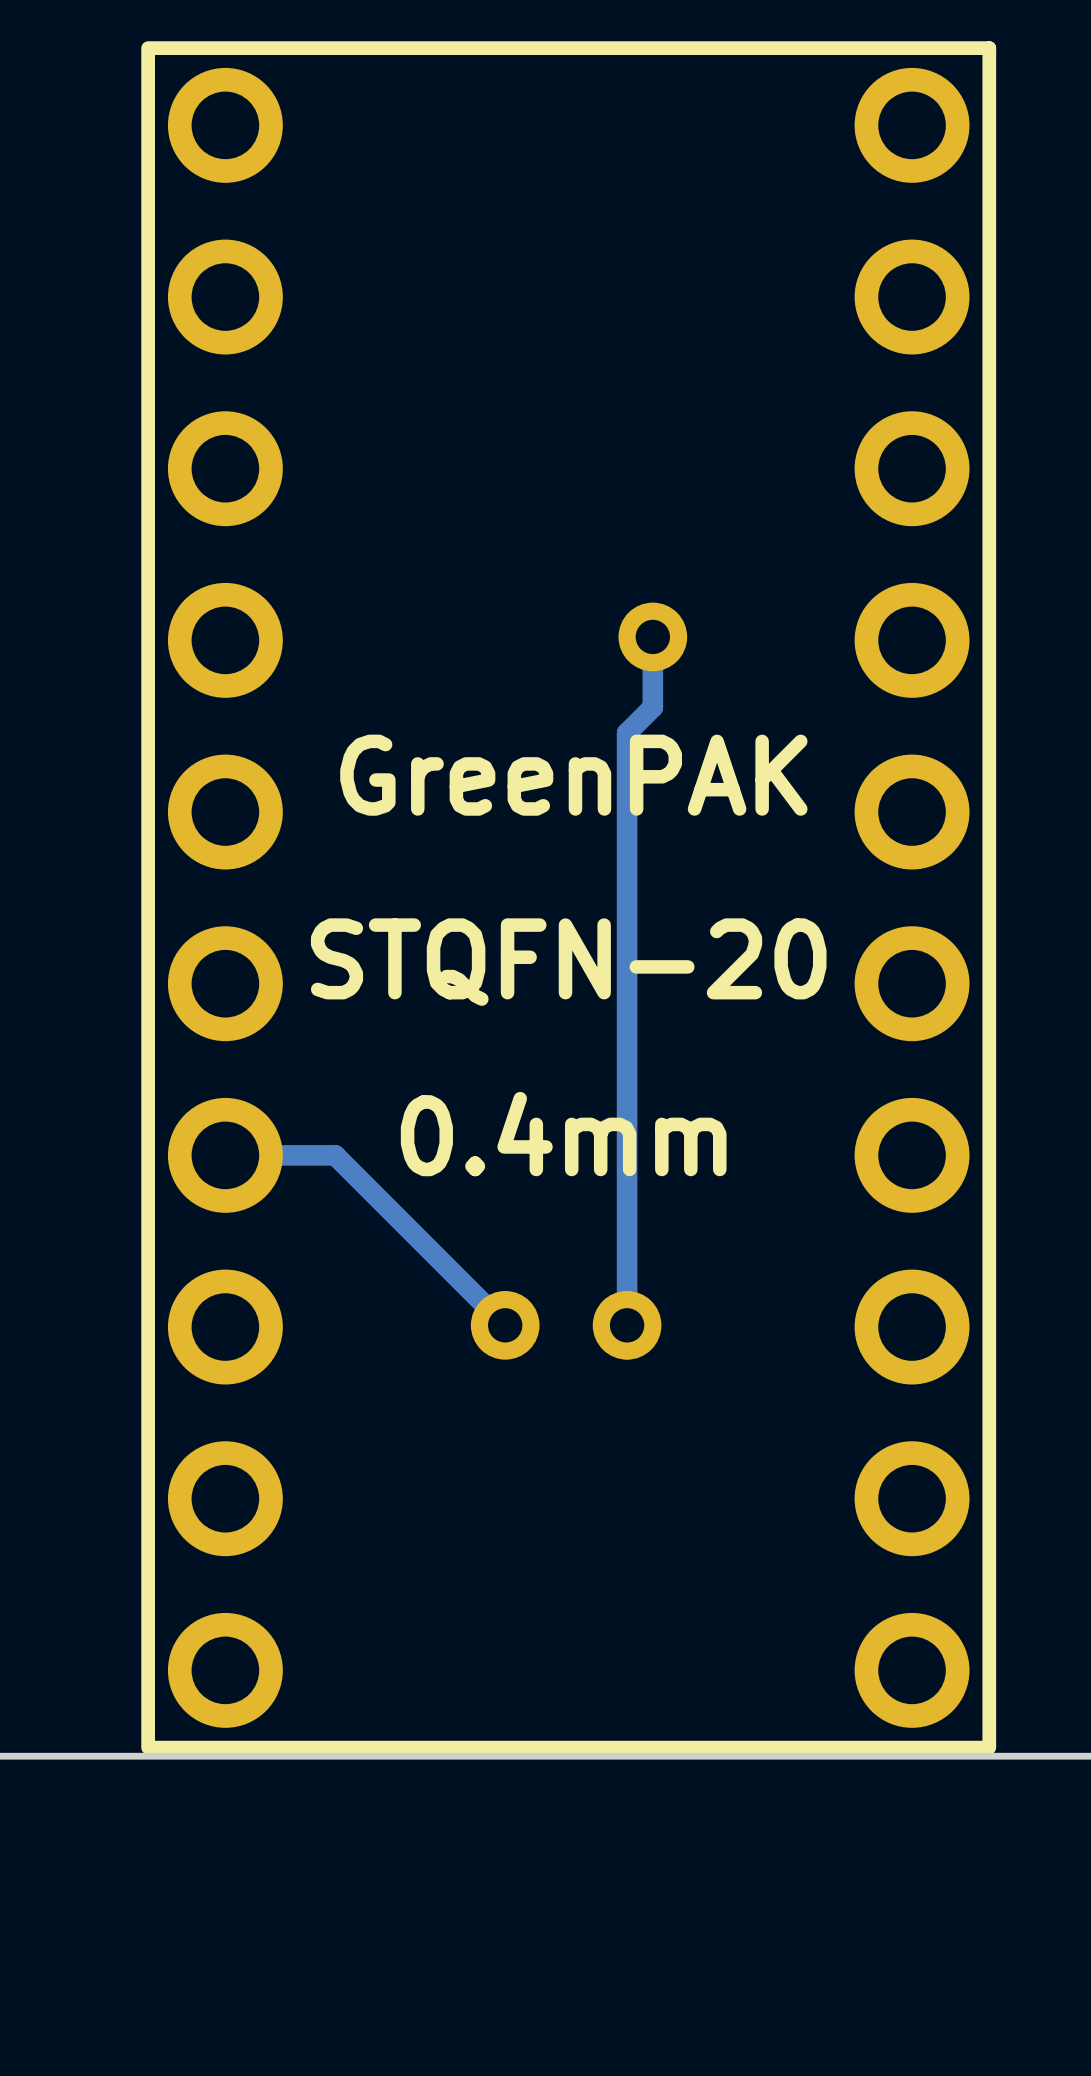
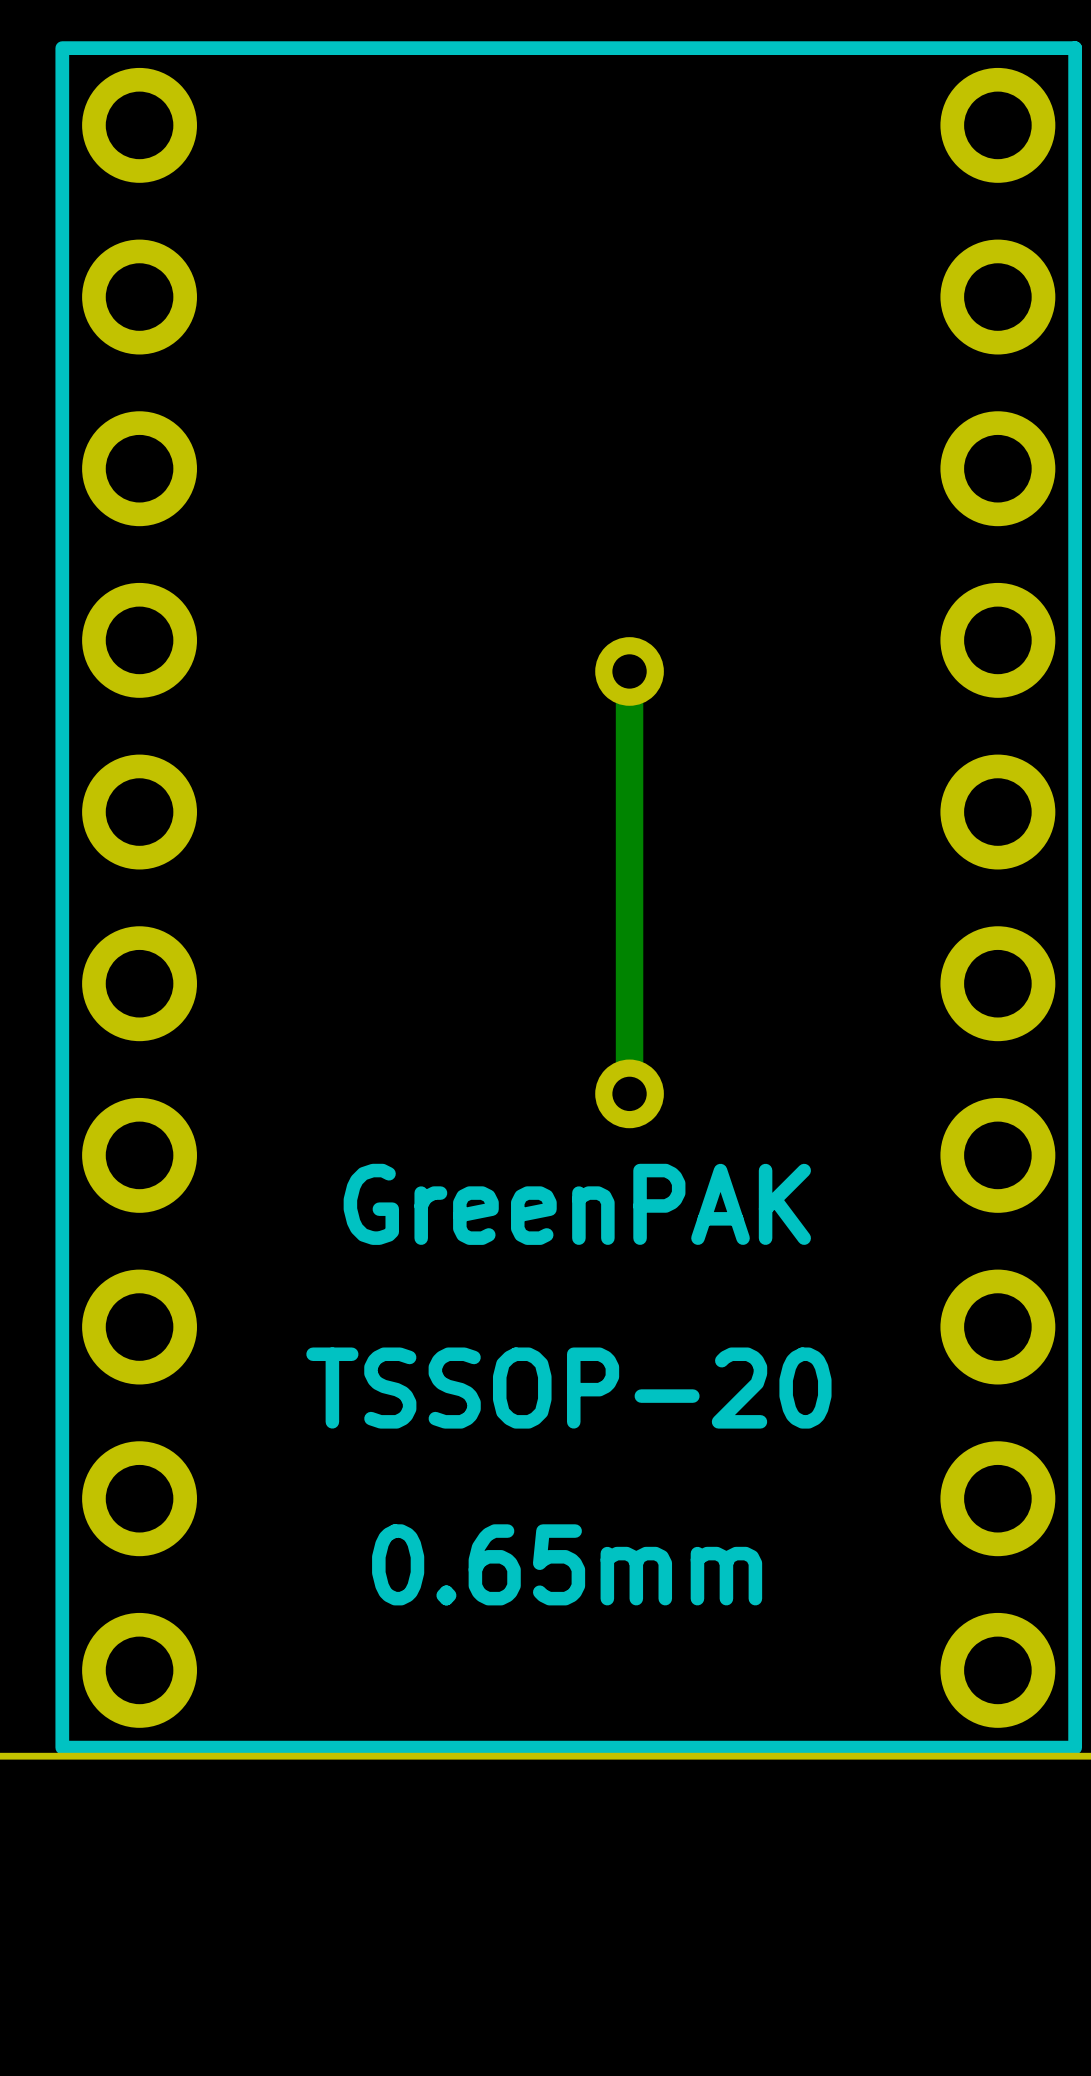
part footprint: [141, 41, 997, 1755] -> [55, 41, 1083, 1755]

